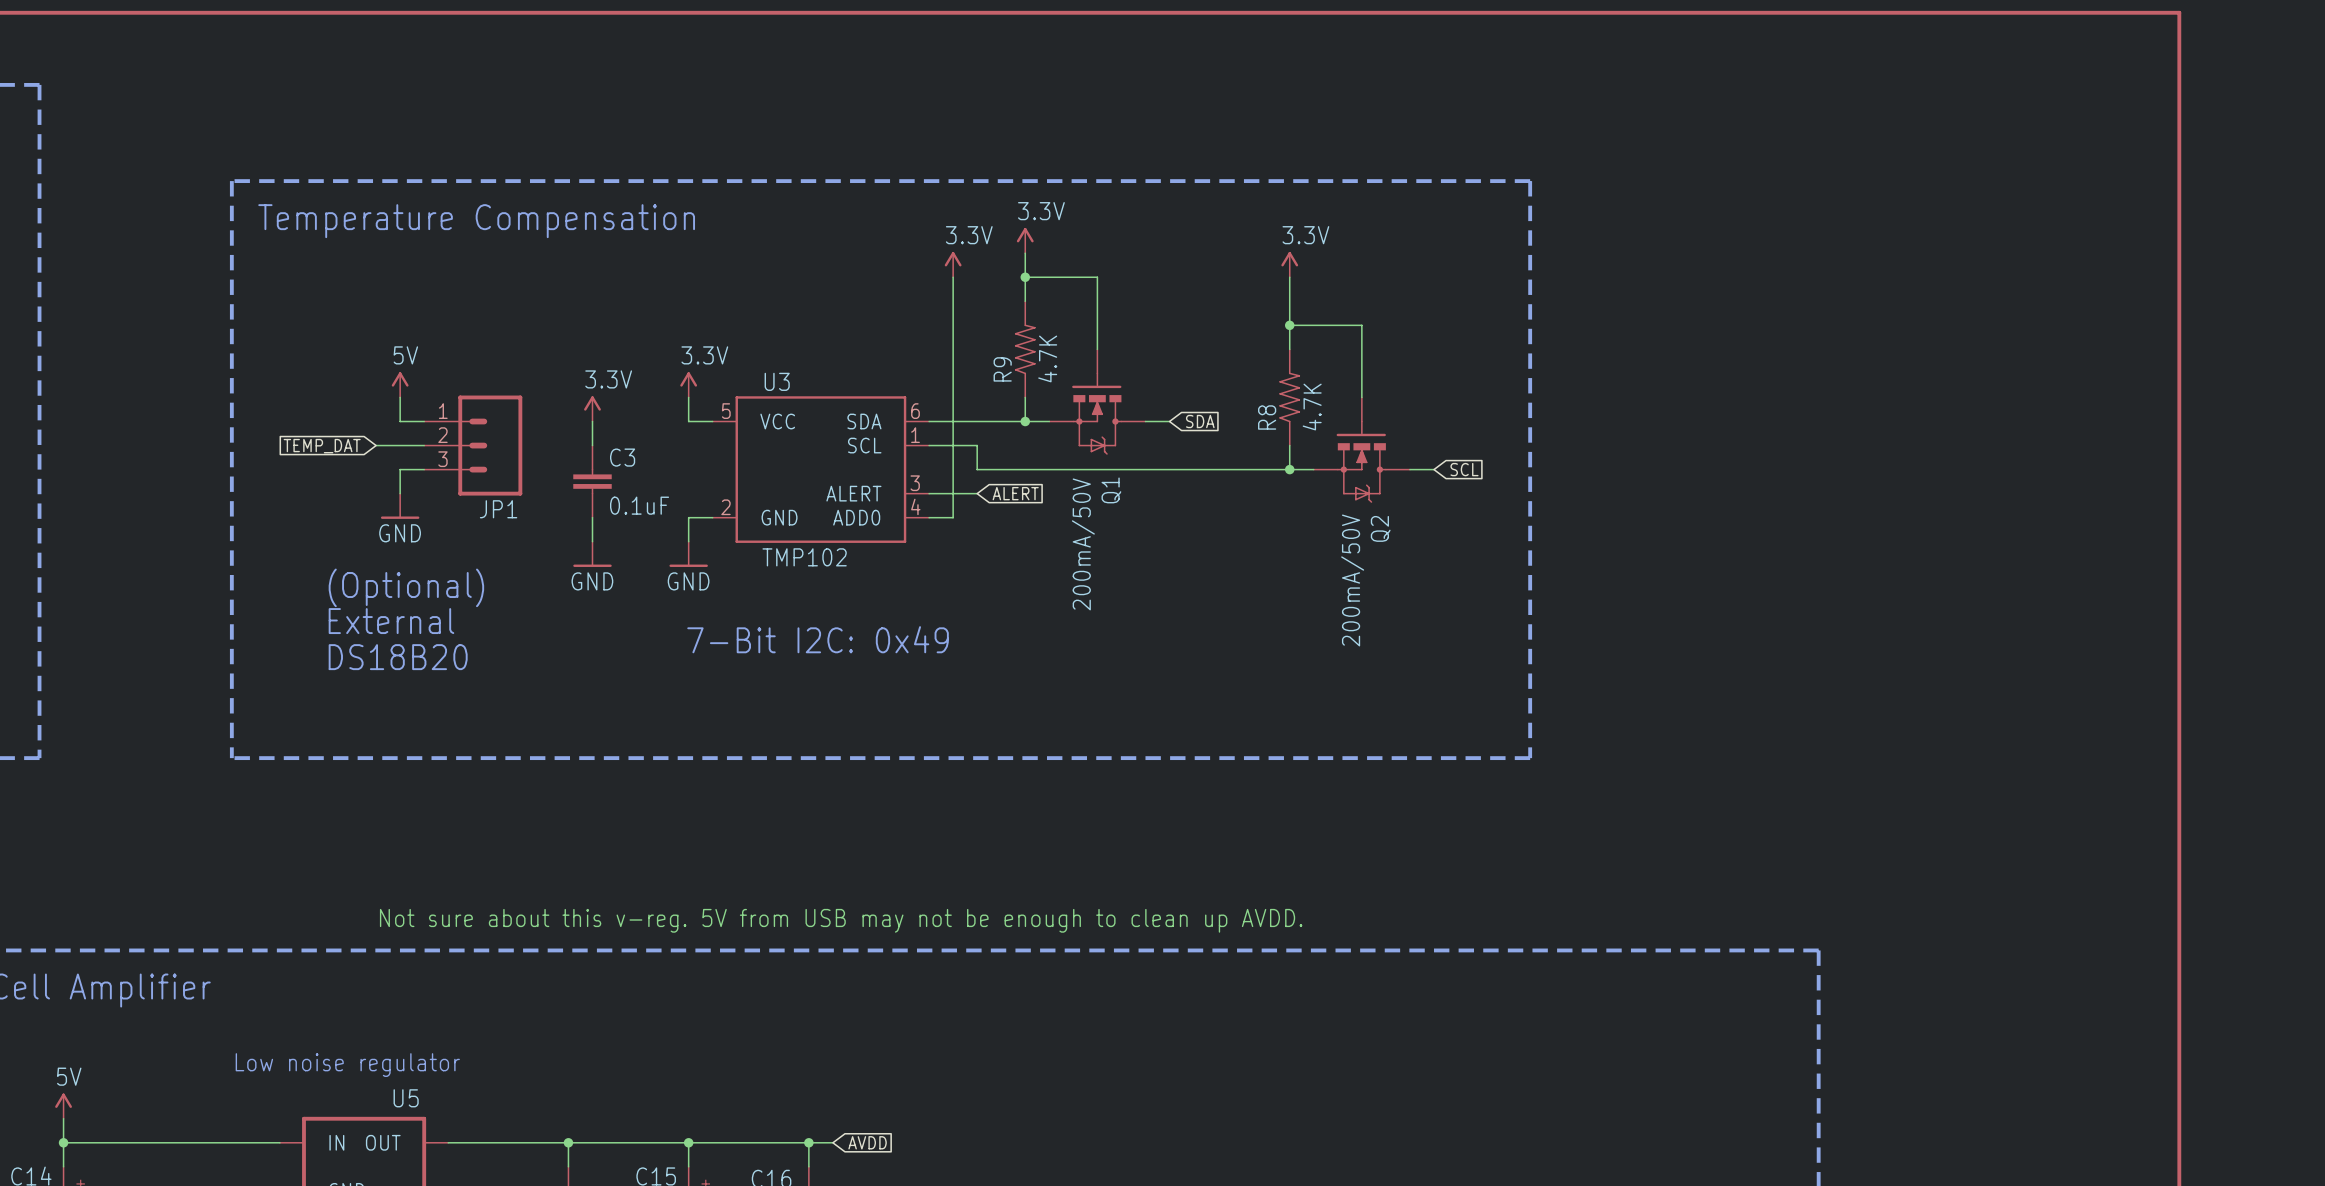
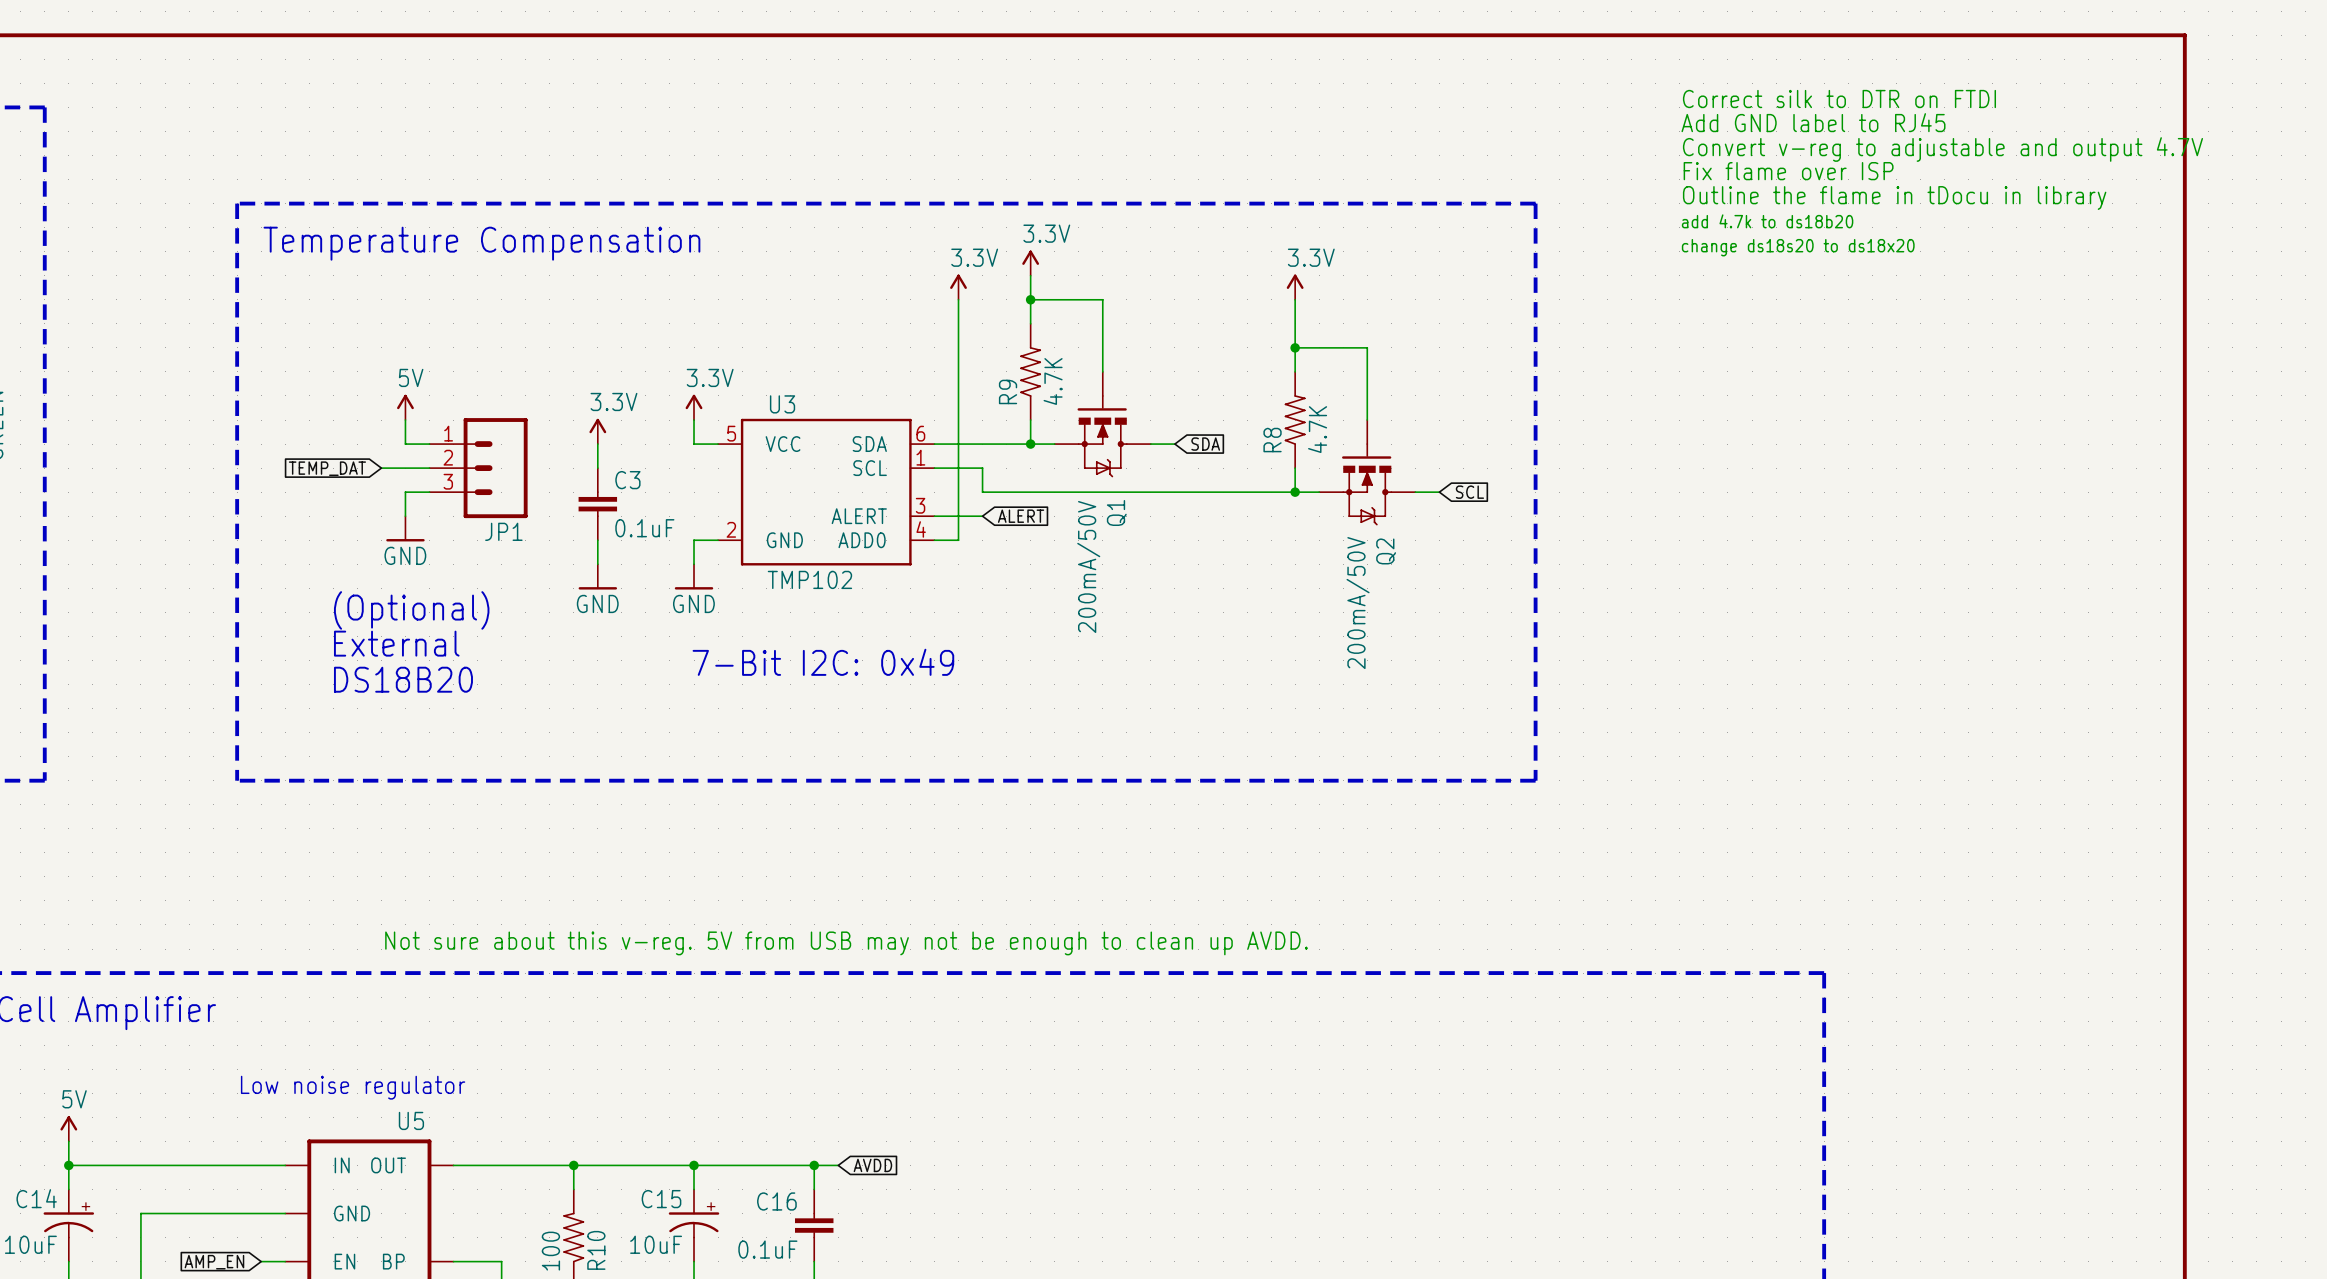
text: none -> Correct silk to DTR on FTDI (1839, 99)
text: none -> Add GND label to RJ45 (1813, 122)
text: none -> Convert v-reg to adjustable and output 4.7V (1942, 149)
text: none -> Fix flame over ISP (1788, 171)
text: none -> Outline the flame in tDocu in library (1894, 197)
text: none -> add 4.7k to ds18b20 (1767, 221)
text: none -> change ds18s20 to ds18x20 (1798, 247)

